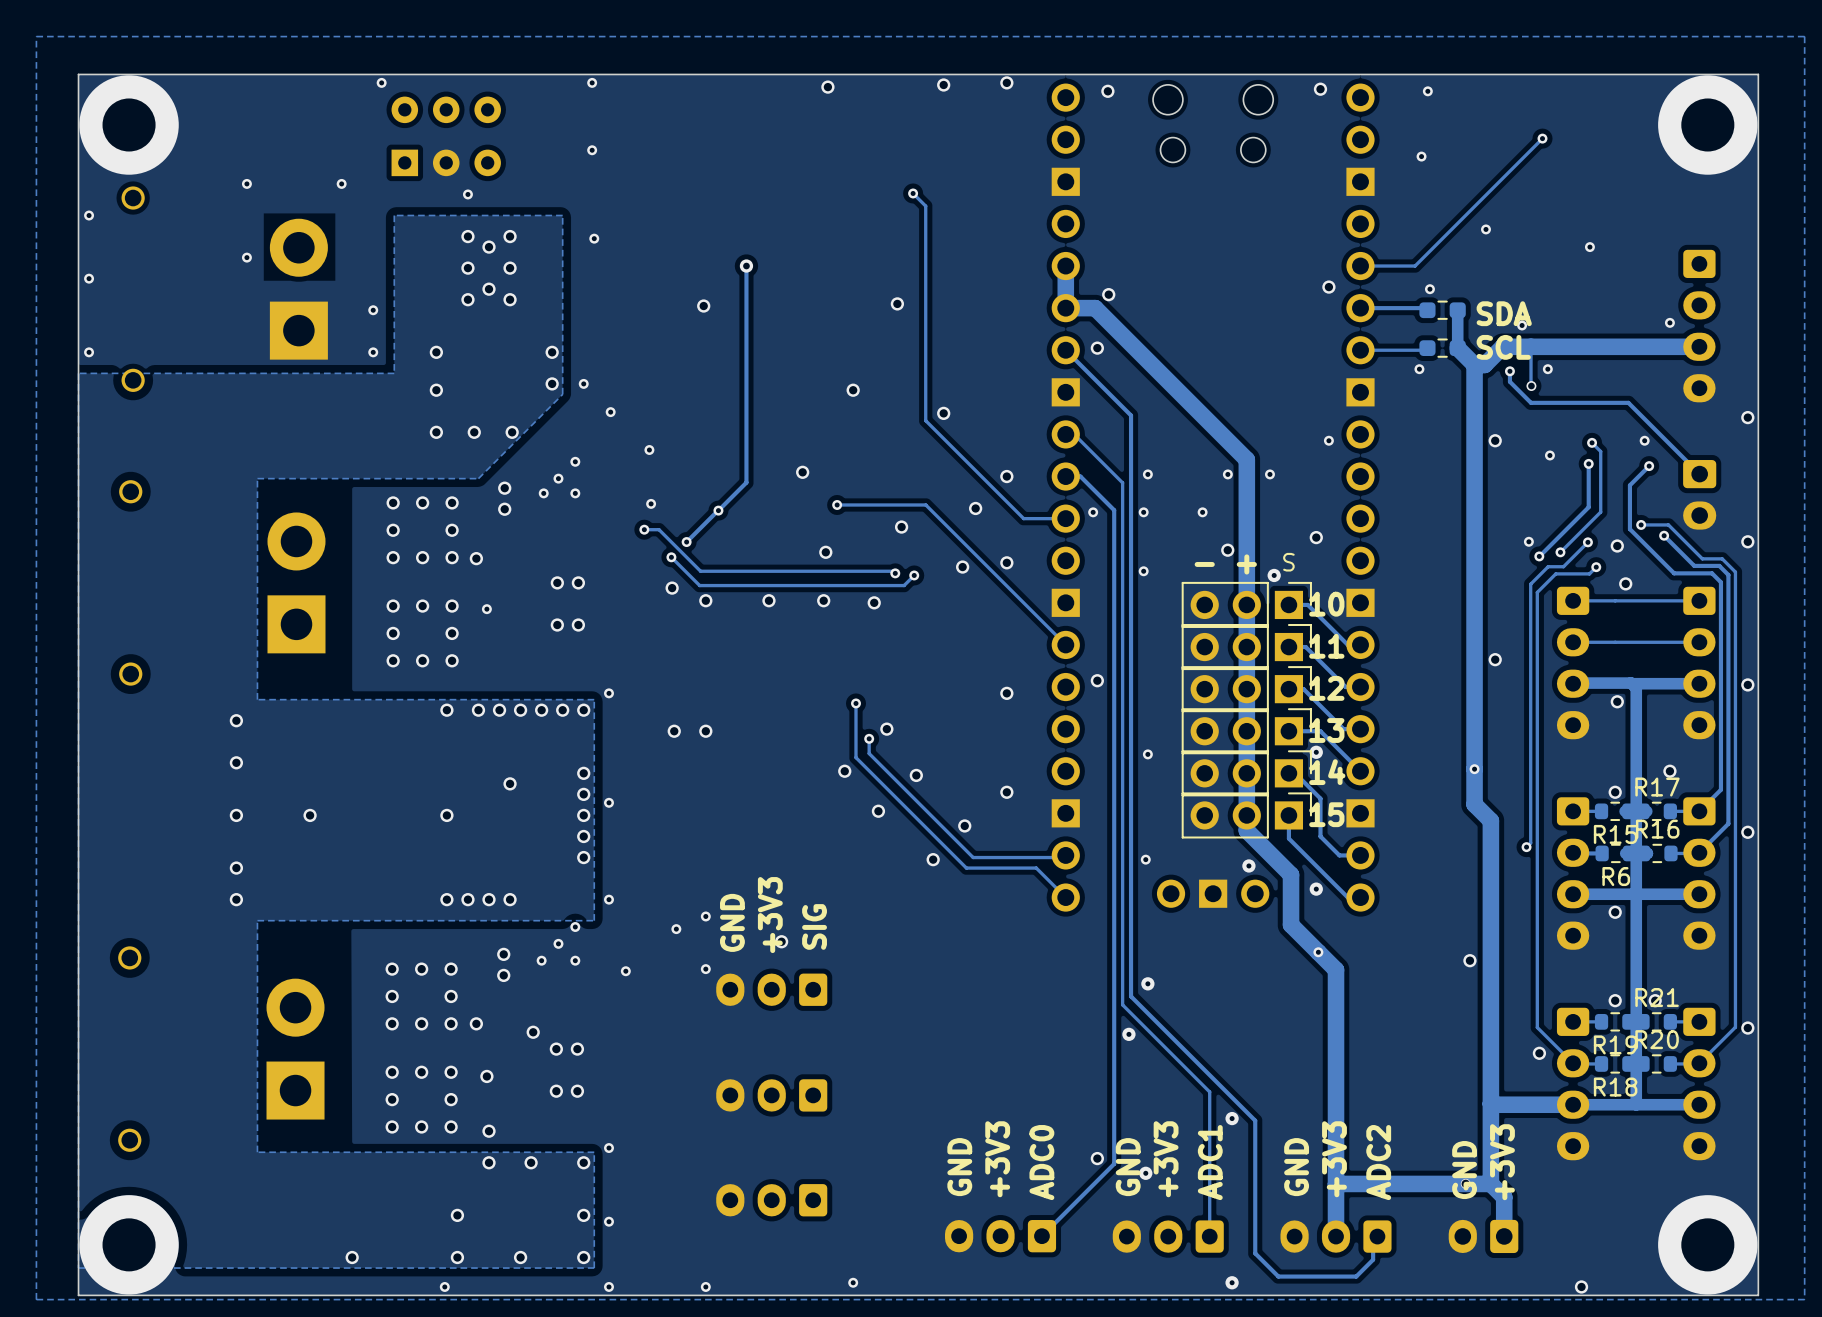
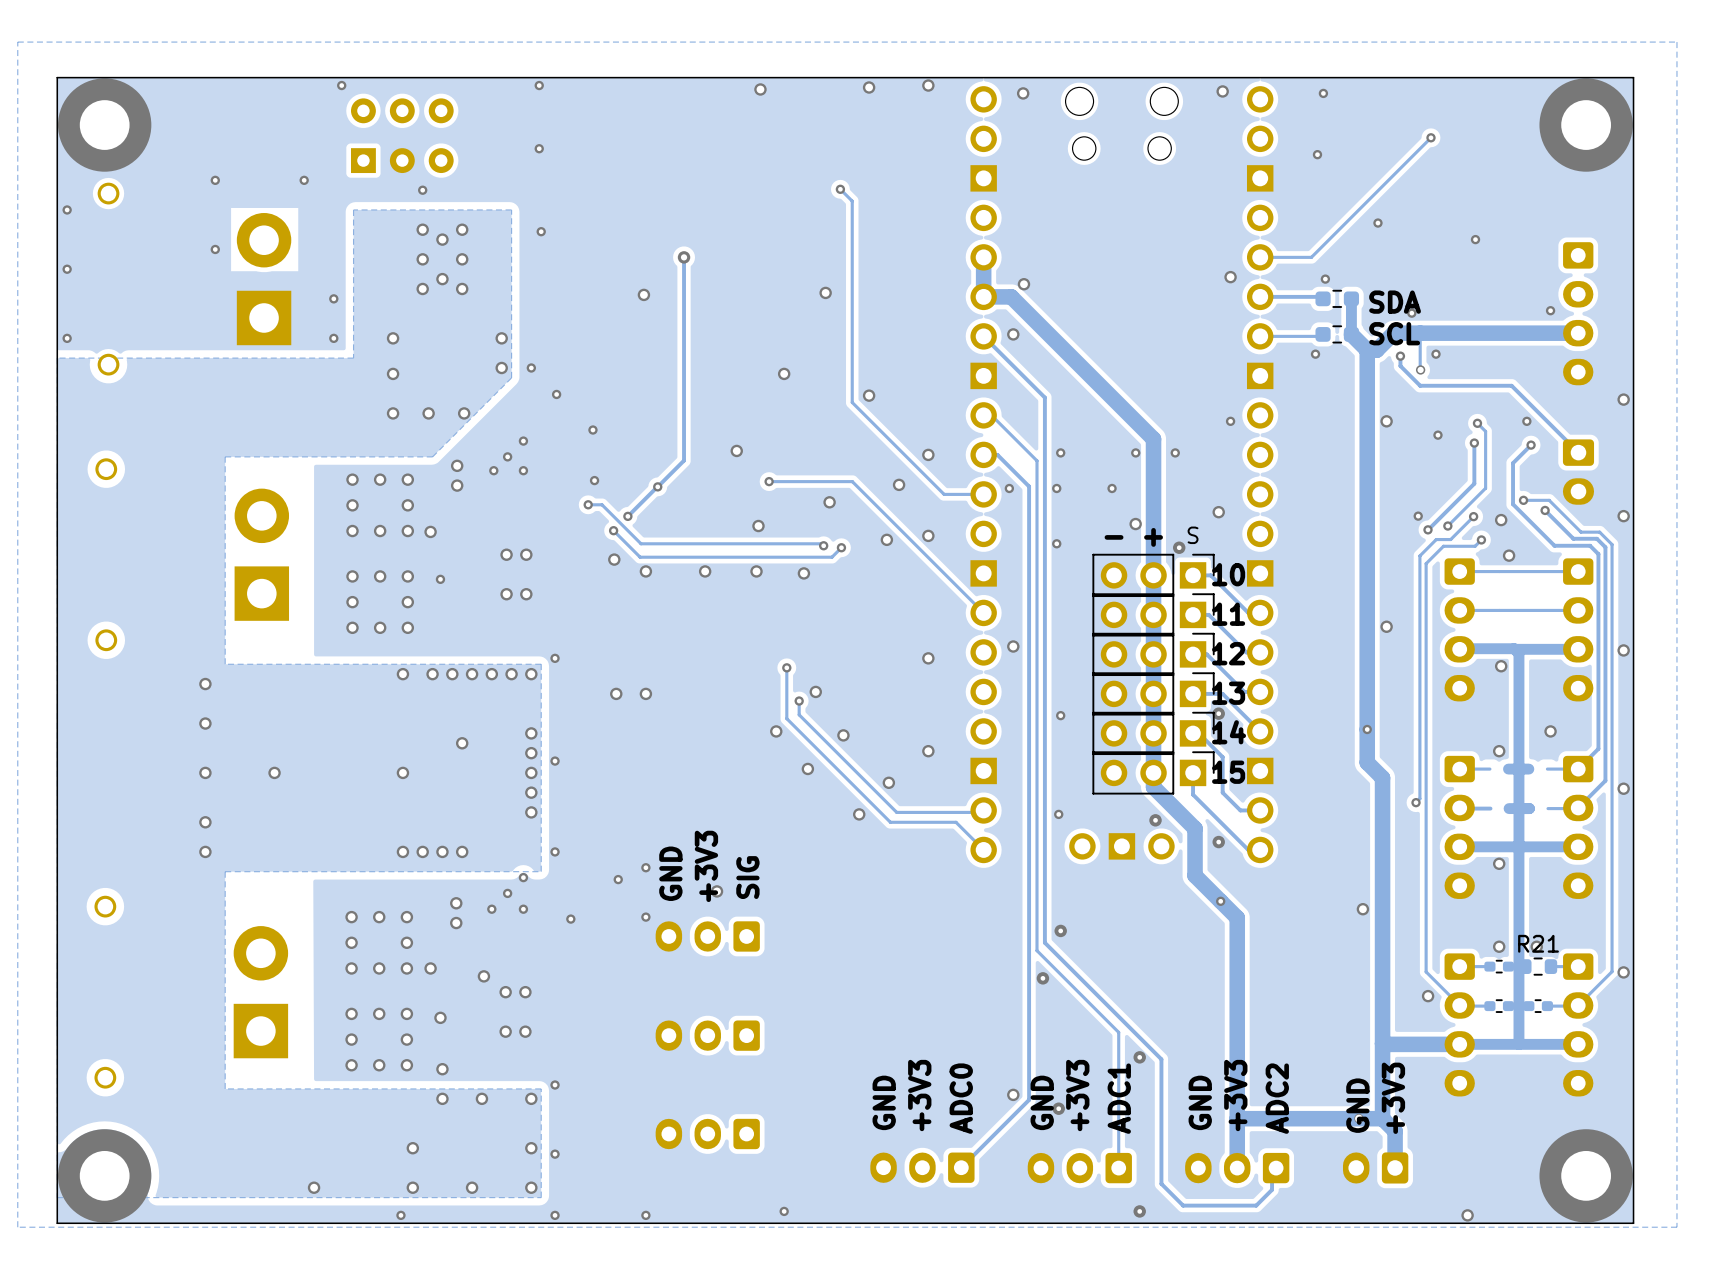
R15: (1615, 811) -> none
R17: (1656, 811) -> none
R6: (1615, 853) -> none
R16: (1657, 853) -> none
R19: (1615, 1021) -> none
part: none -> (1499, 966)
R18: (1615, 1063) -> none
part: none -> (1499, 1006)
R20: (1656, 1063) -> none
part: none -> (1538, 1006)

